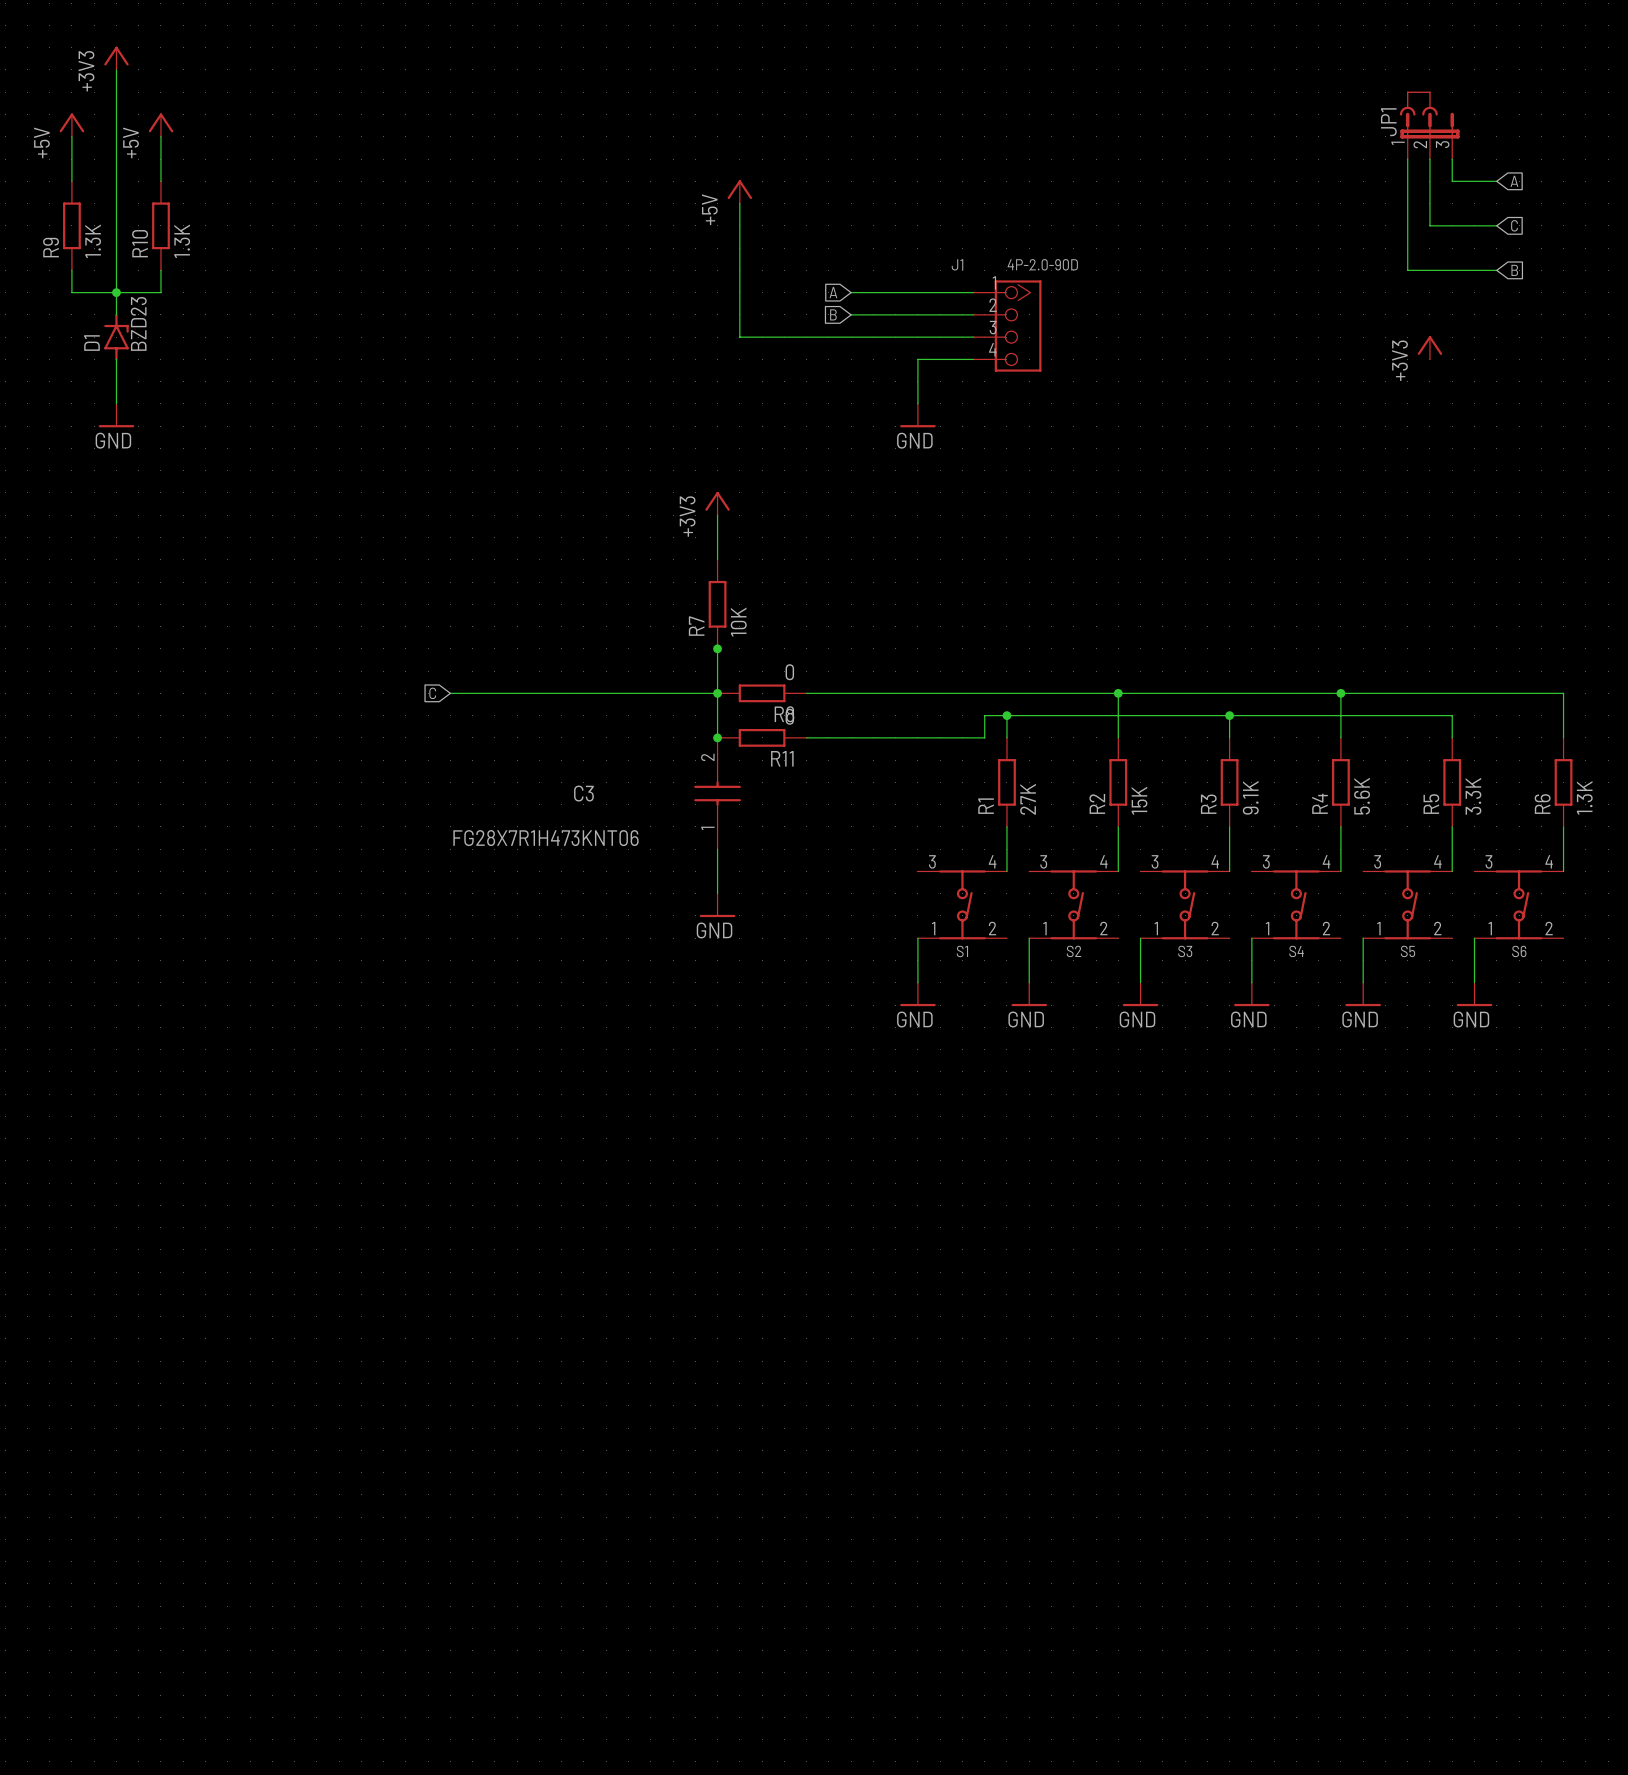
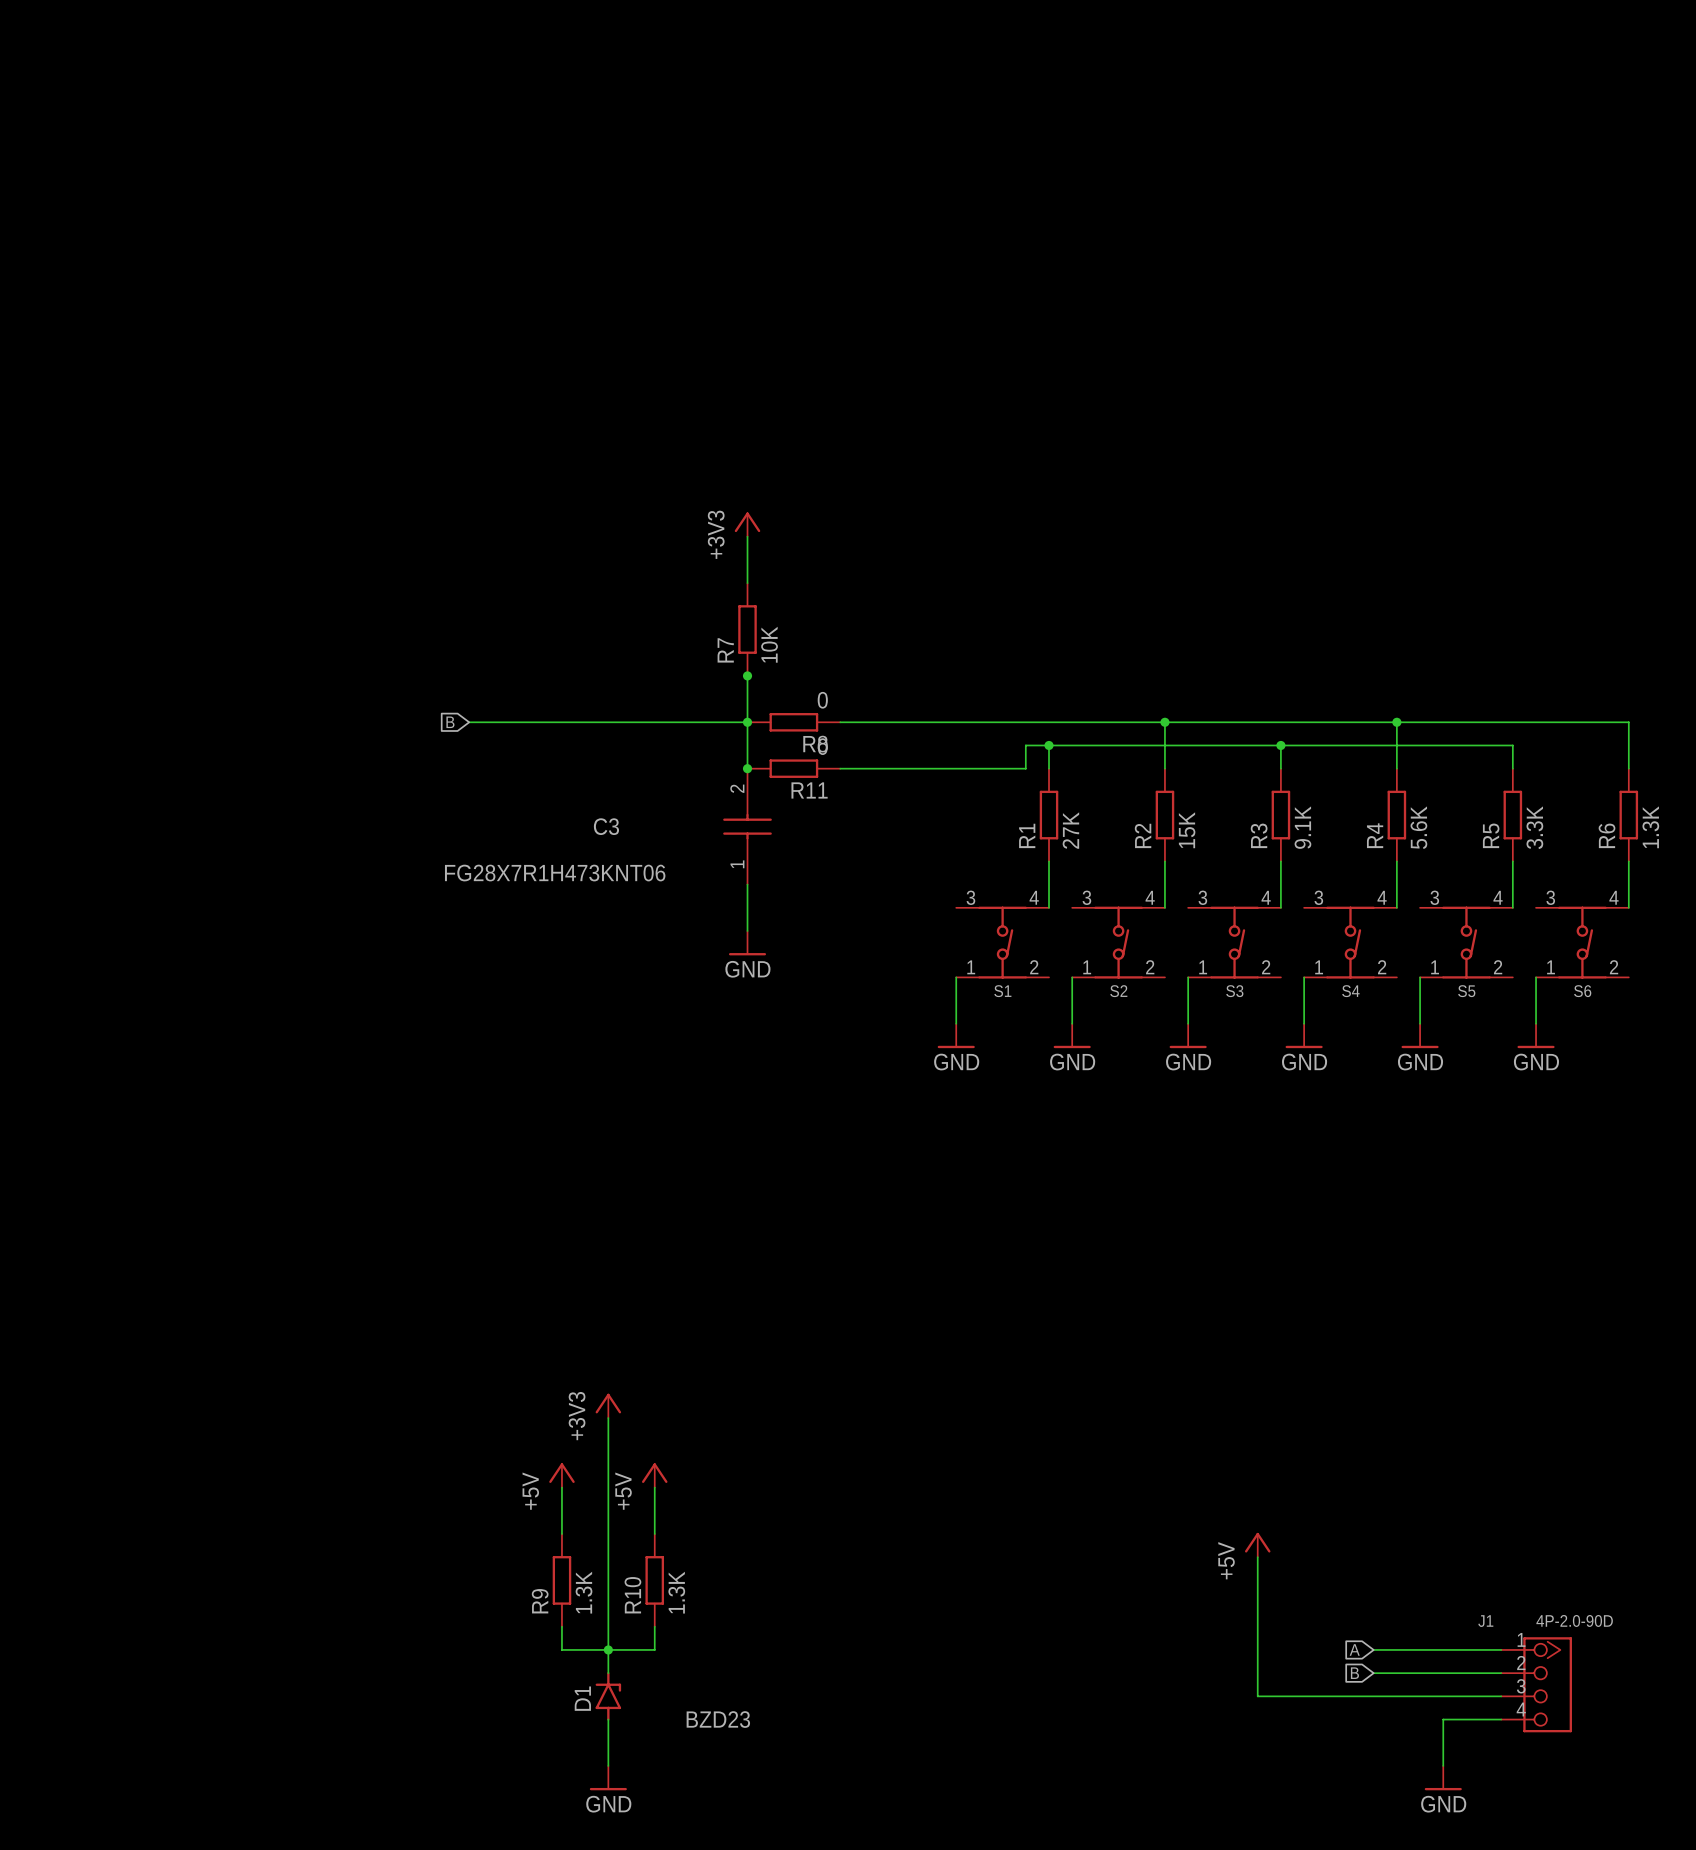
power symbol: +3V3 (116, 58) -> none
wire: (116, 69) (116, 314) -> none
part: (1418, 103) -> none
power symbol: +5V (71, 125) -> none
power symbol: +5V (160, 125) -> none
JP1: (1429, 135) -> none
wire: (71, 136) (71, 181) -> none
wire: (160, 136) (160, 181) -> none
wire: (1407, 159) (1407, 270) (1496, 270) -> none
wire: (1429, 159) (1429, 225) (1496, 225) -> none
wire: (1452, 159) (1452, 181) (1496, 181) -> none
global label: A (1514, 181) -> none
power symbol: +5V (739, 191) -> none
wire: (739, 203) (739, 337) (973, 337) -> none
R9 position: (71, 225) -> (561, 1580)
R10 position: (160, 225) -> (654, 1580)
global label: C (1514, 225) -> none
wire: (71, 270) (71, 292) (160, 292) (160, 270) -> none
global label: B (1514, 270) -> none
junction: (116, 292) -> none
global label: A (833, 292) -> none
wire: (851, 292) (973, 292) -> none
global label: B (833, 314) -> none
wire: (851, 314) (973, 314) -> none
D1 value rotation: 0° (138, 323) -> 90° clockwise (718, 1719)
D1 value position: BZD23 (138, 323) -> BZD23 (718, 1719)
J1 position: (1007, 326) -> (1536, 1684)
D1 position: (116, 337) -> (608, 1696)
power symbol: +3V3 (1429, 347) -> none
wire: (116, 359) (116, 403) -> none
wire: (973, 359) (917, 359) (917, 403) -> none
power symbol: GND (116, 415) -> none
power symbol: GND (917, 415) -> none
global label: C (432, 693) -> B (450, 722)
power symbol: none -> +3V3 (608, 1405)
wire: none -> (608, 1418) (608, 1673)
power symbol: none -> +5V (561, 1475)
power symbol: none -> +5V (654, 1475)
wire: none -> (561, 1487) (561, 1534)
wire: none -> (654, 1487) (654, 1534)
power symbol: none -> +5V (1257, 1545)
wire: none -> (1257, 1557) (1257, 1696) (1501, 1696)
wire: none -> (561, 1626) (561, 1649) (654, 1649) (654, 1626)
junction: none -> (608, 1649)
global label: none -> A (1354, 1649)
wire: none -> (1373, 1649) (1501, 1649)
global label: none -> B (1354, 1673)
wire: none -> (1373, 1673) (1501, 1673)
wire: none -> (608, 1719) (608, 1765)
wire: none -> (1501, 1719) (1443, 1719) (1443, 1765)
power symbol: none -> GND (608, 1778)
power symbol: none -> GND (1443, 1778)

